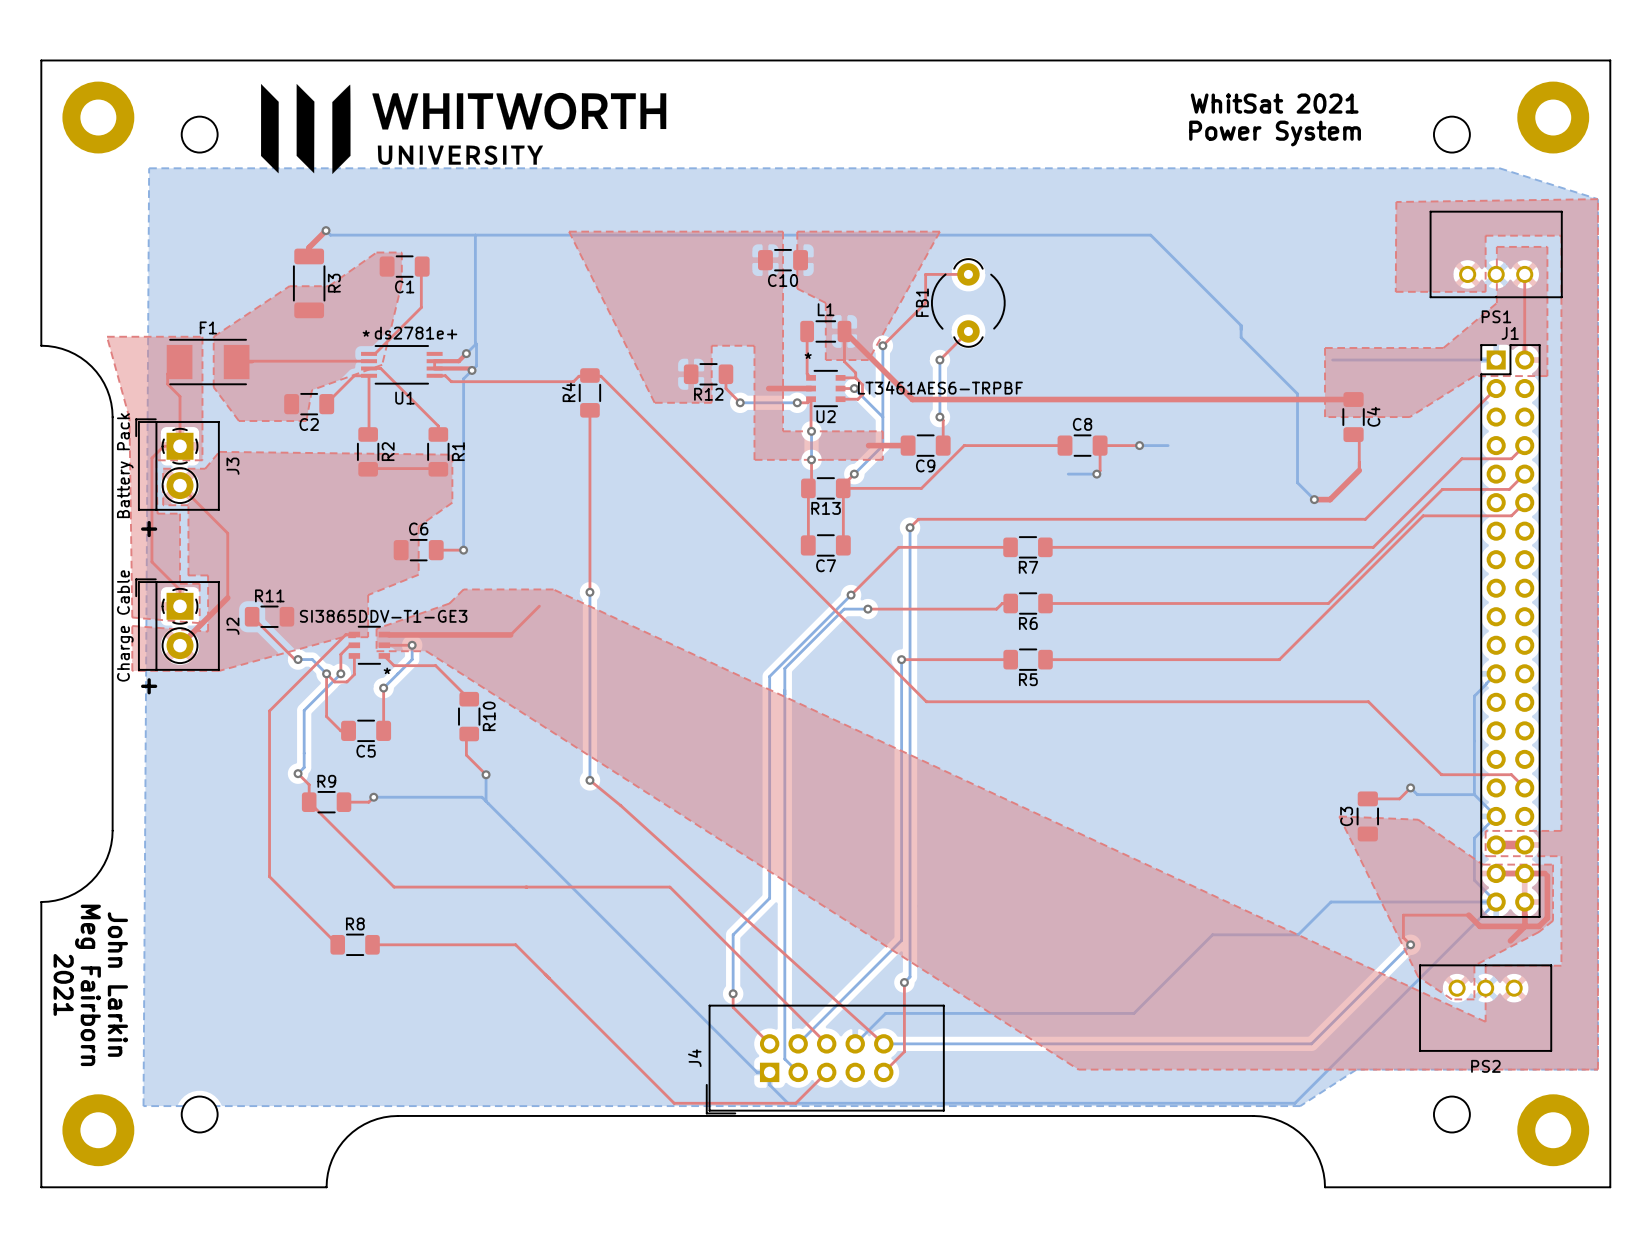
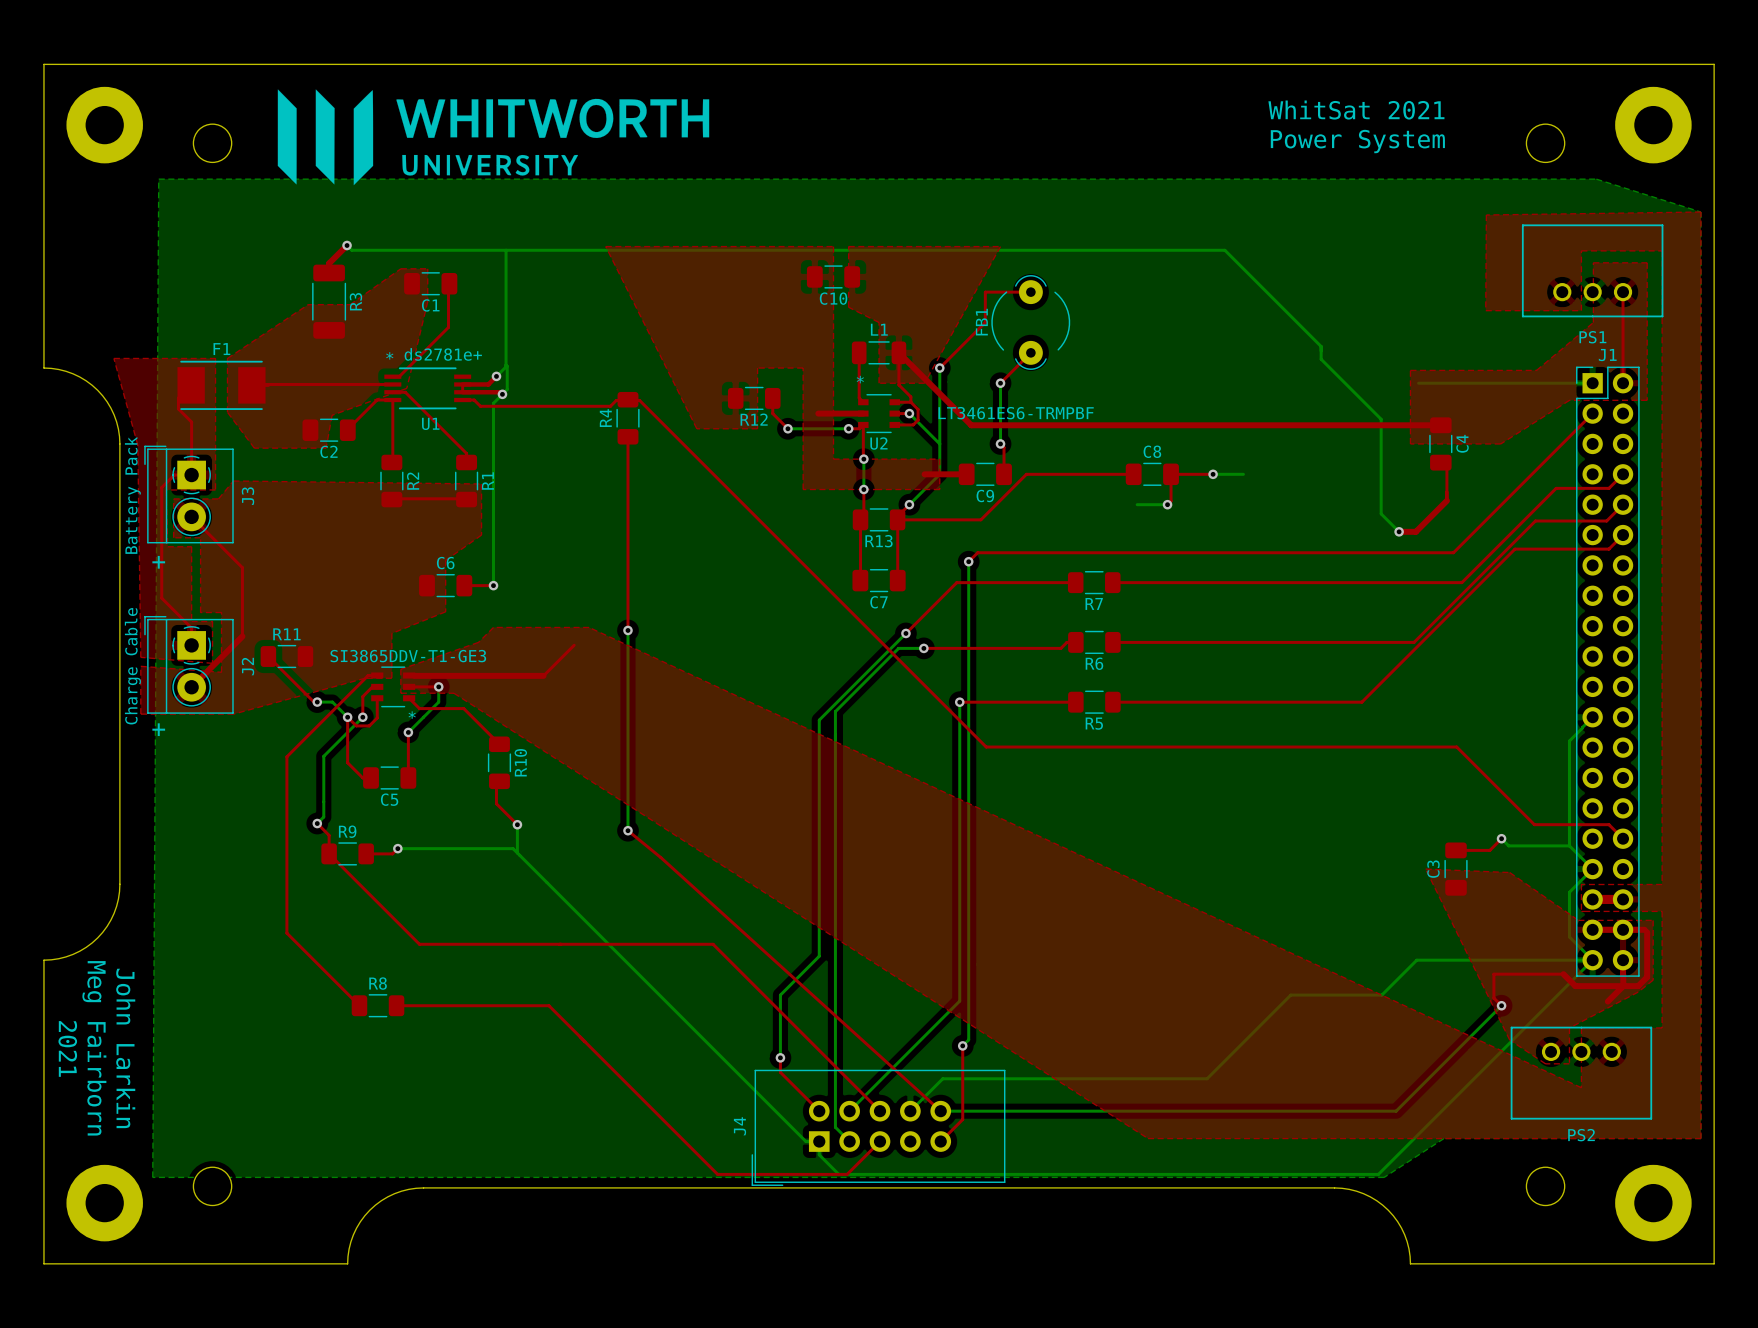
U2 value: LT3461AES6-TRPBF (940, 387) -> LT3461ES6-TRMPBF (1016, 413)

